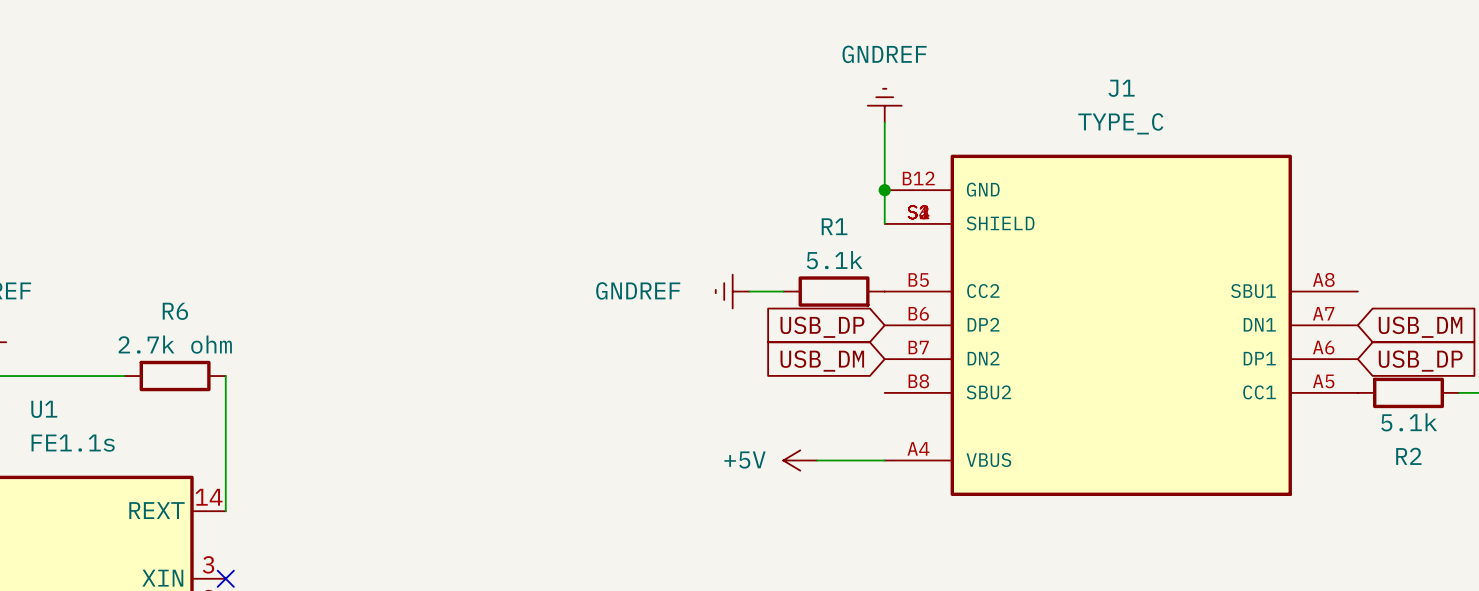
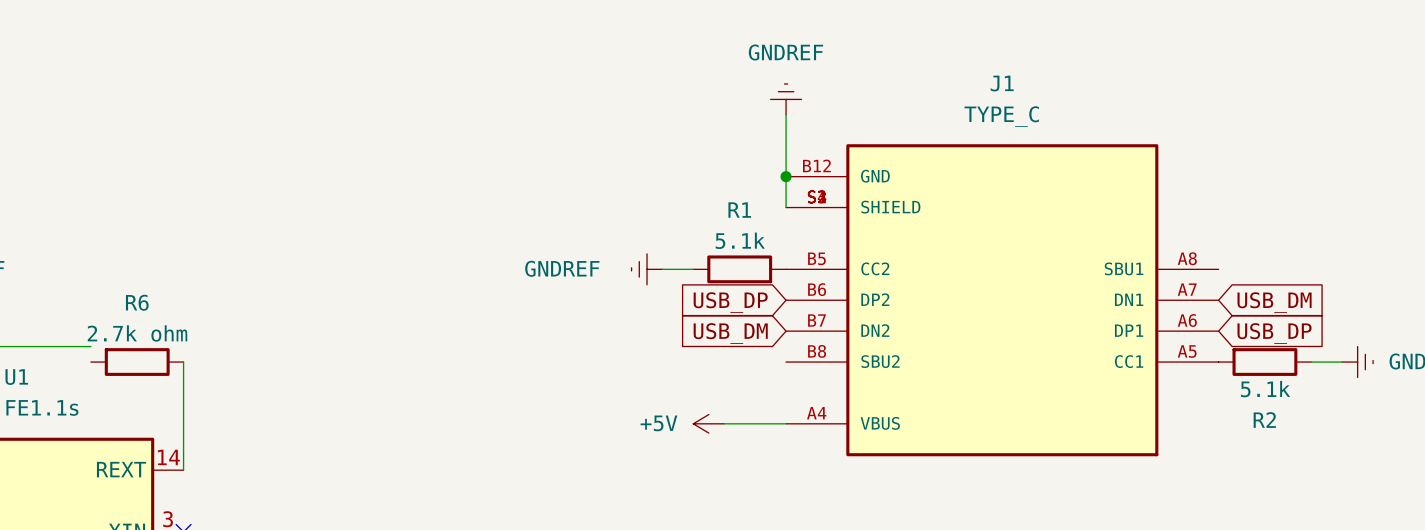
R6 position: (175, 376) -> (137, 362)
wire: (225, 376) (225, 392) -> none

